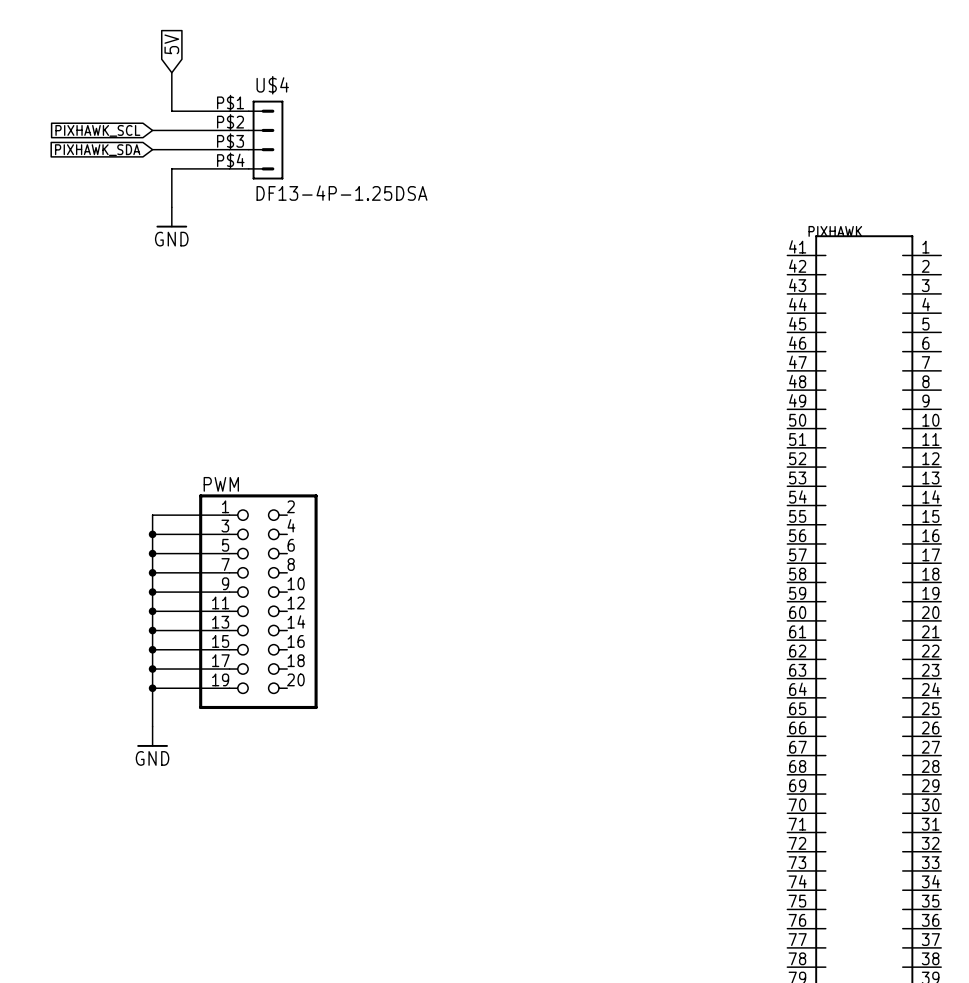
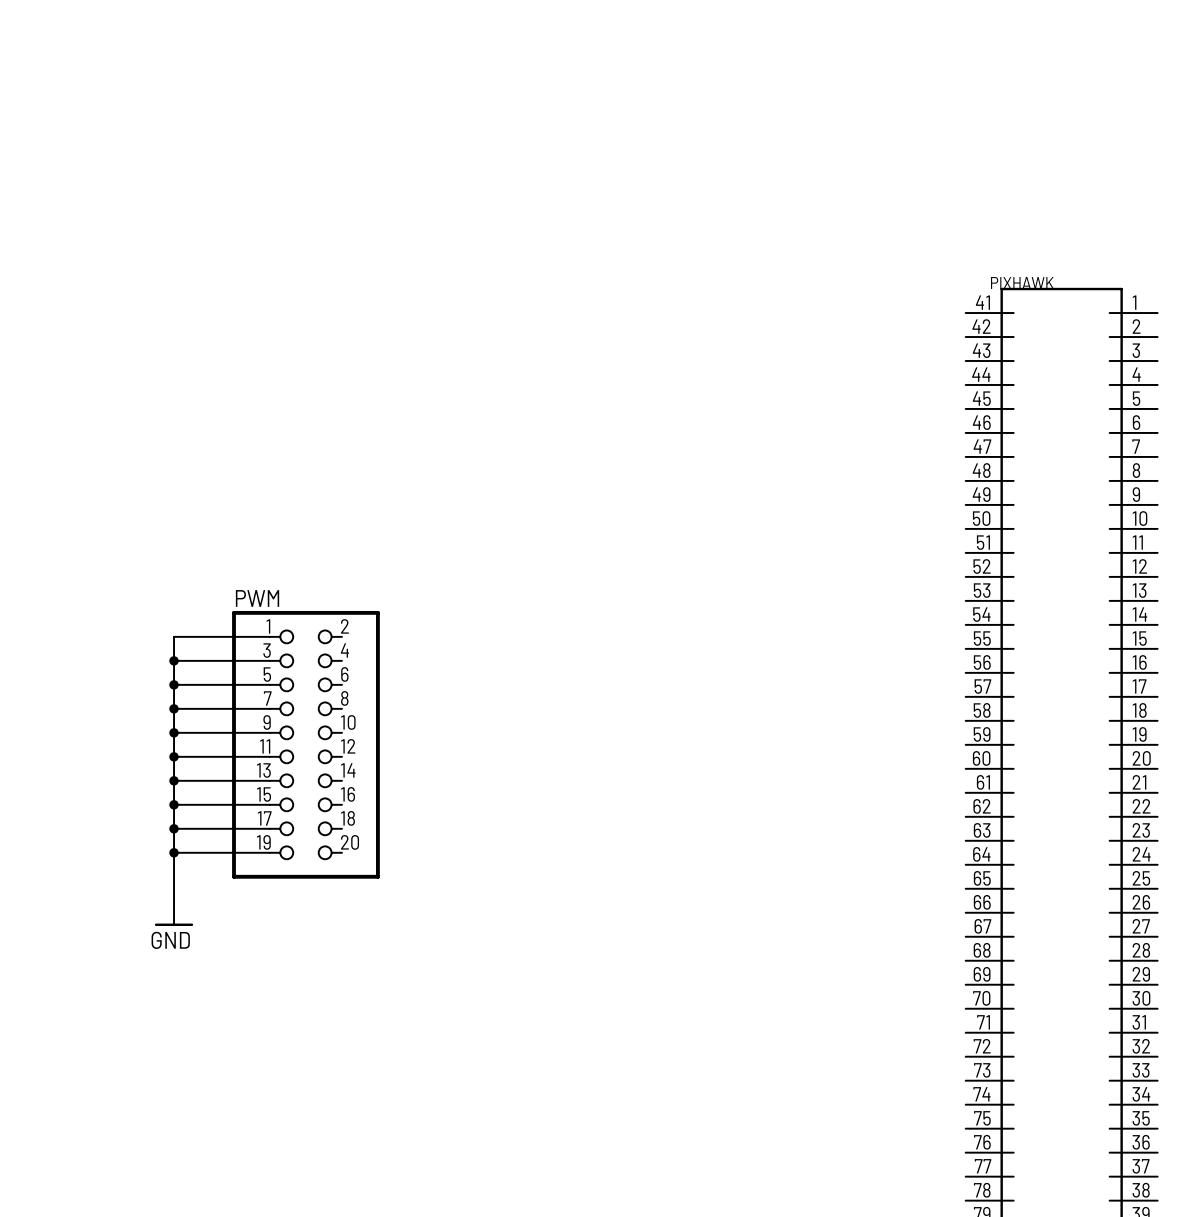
global label: 5V (171, 44) -> none
wire: (171, 72) (171, 111) (229, 111) -> none
global label: PIXHAWK_SCL (97, 130) -> none
wire: (152, 130) (229, 130) -> none
U$4: DF13-4P-1.25DSA (256, 140) -> none
wire: (152, 149) (229, 149) -> none
global label: PIXHAWK_SDA (97, 150) -> none
wire: (229, 168) (171, 168) (171, 207) -> none
power symbol: GND (171, 217) -> none

